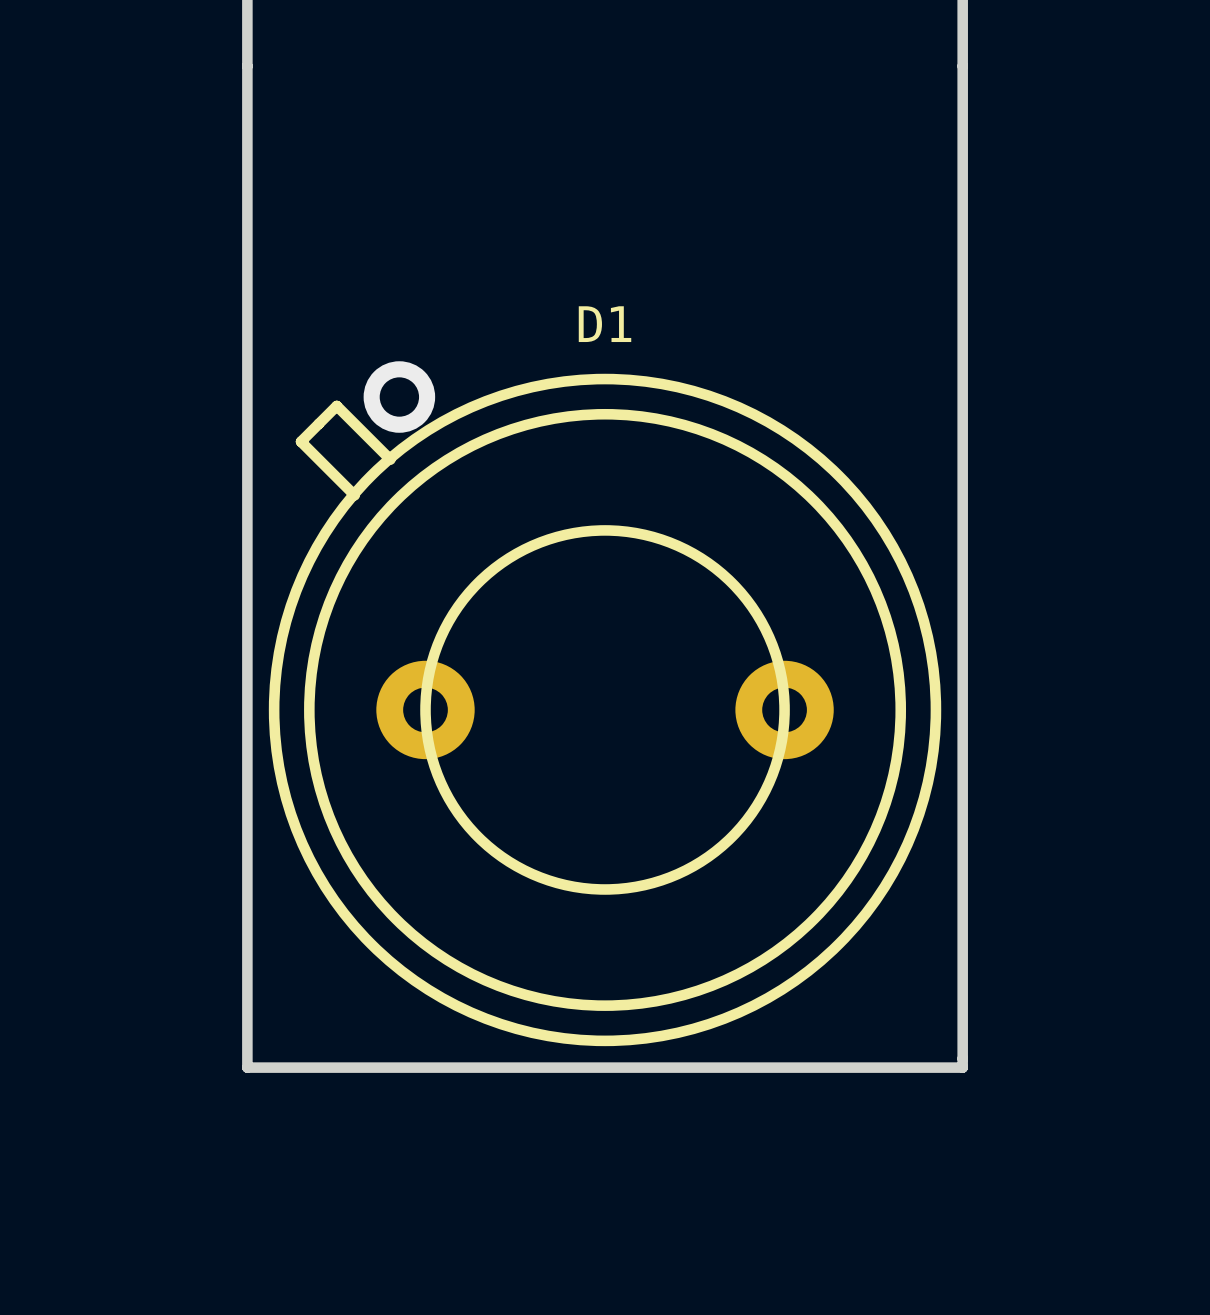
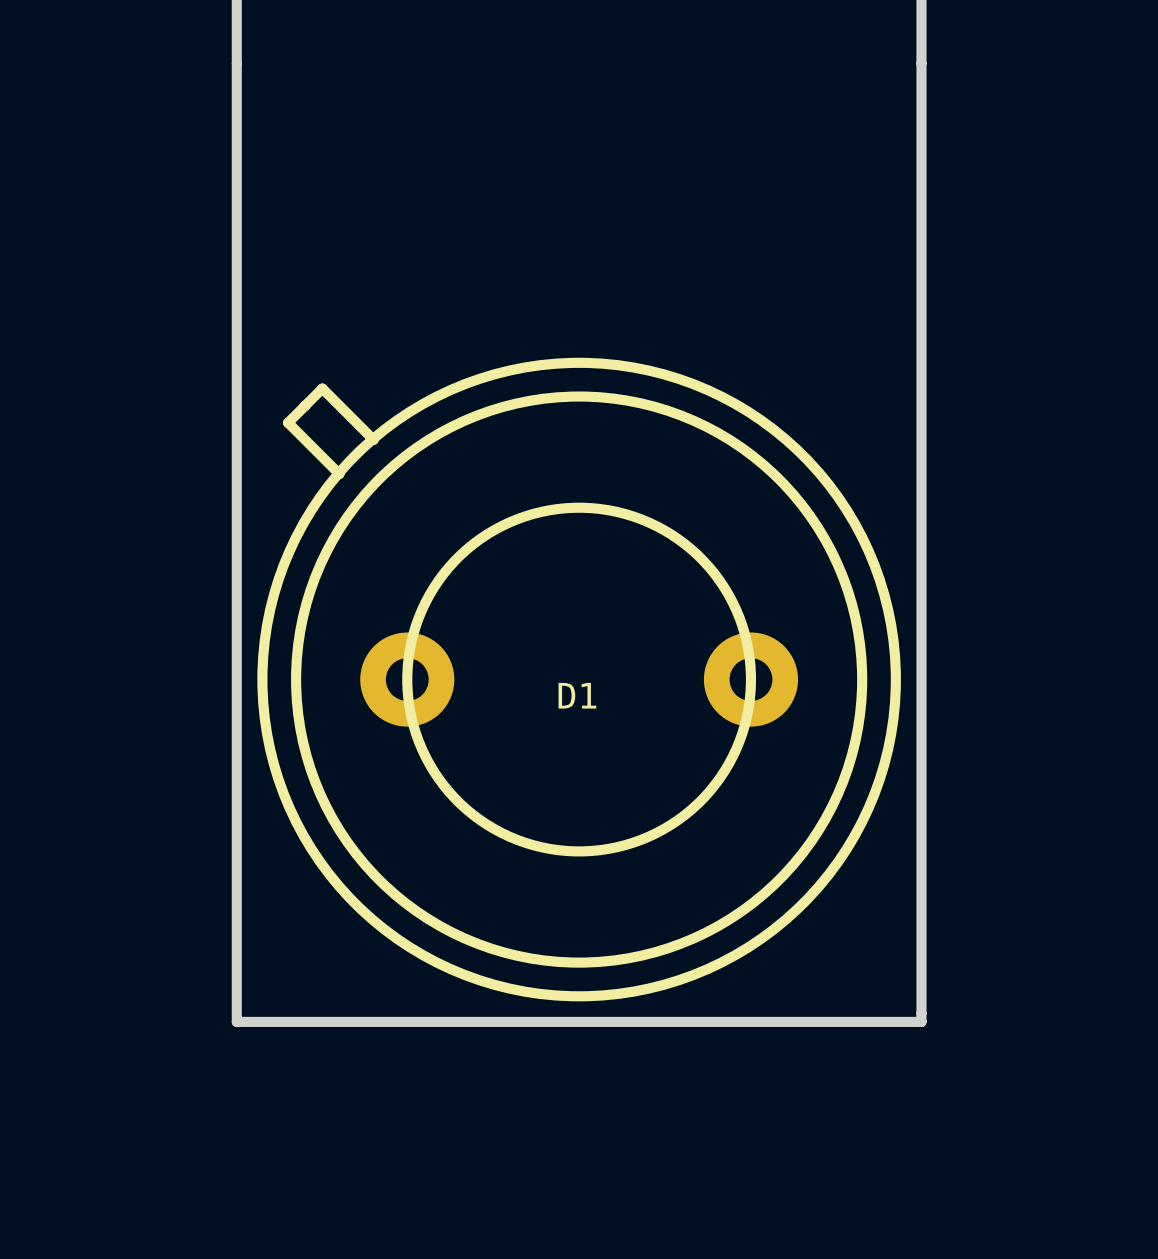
D1 name position: D1 (605, 324) -> D1 (577, 695)
via: (399, 397) -> none

